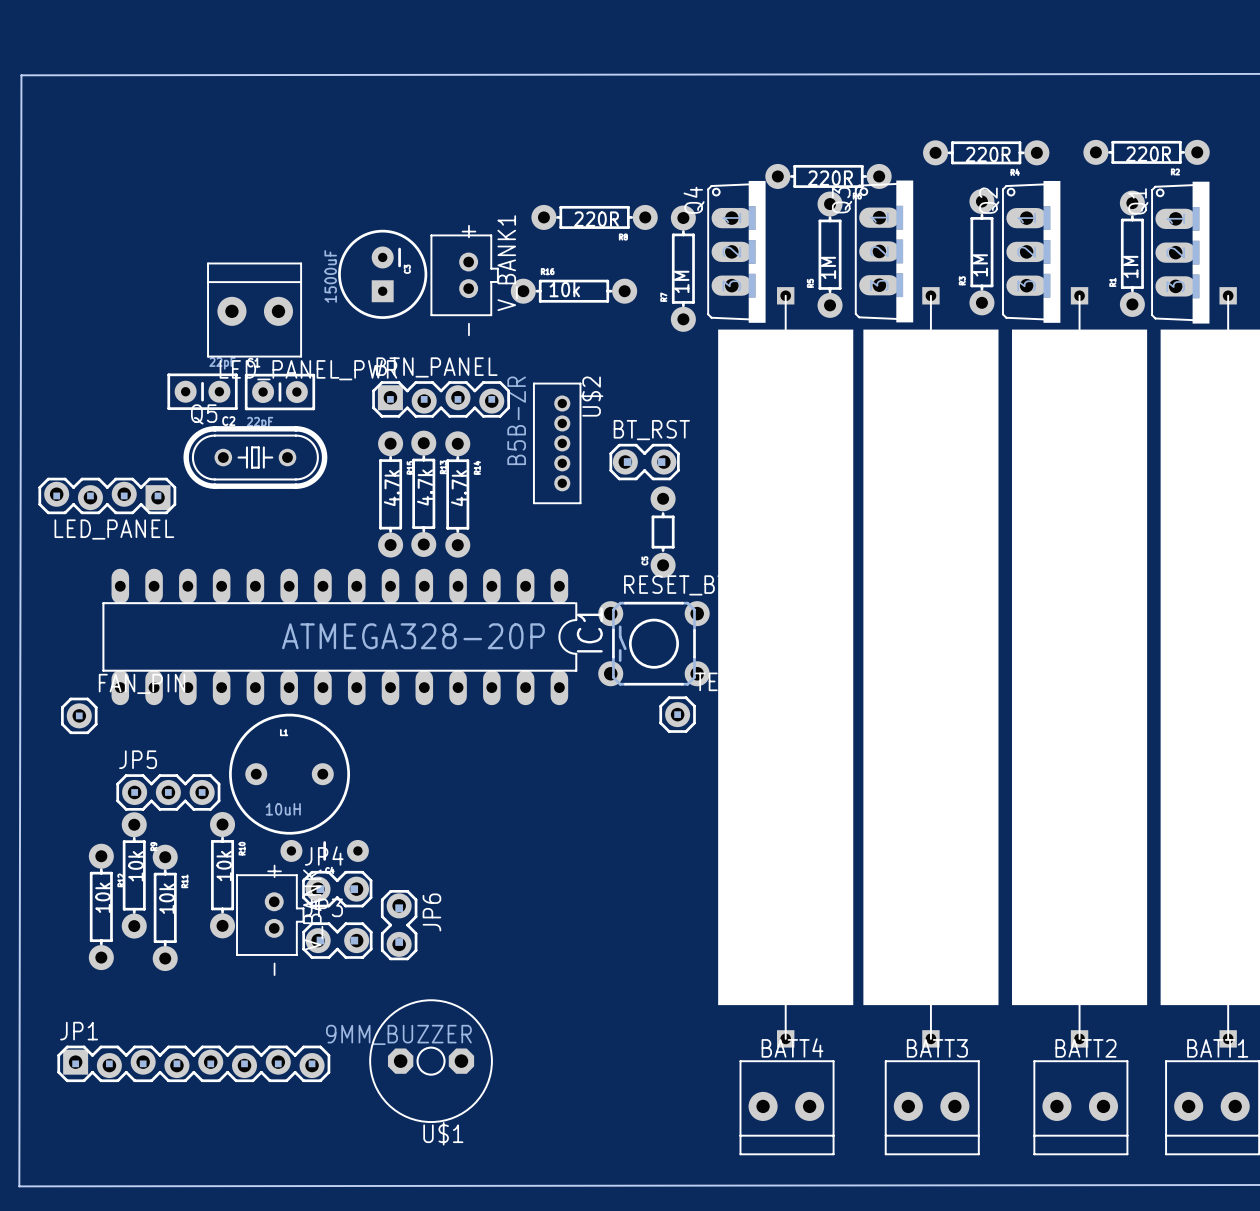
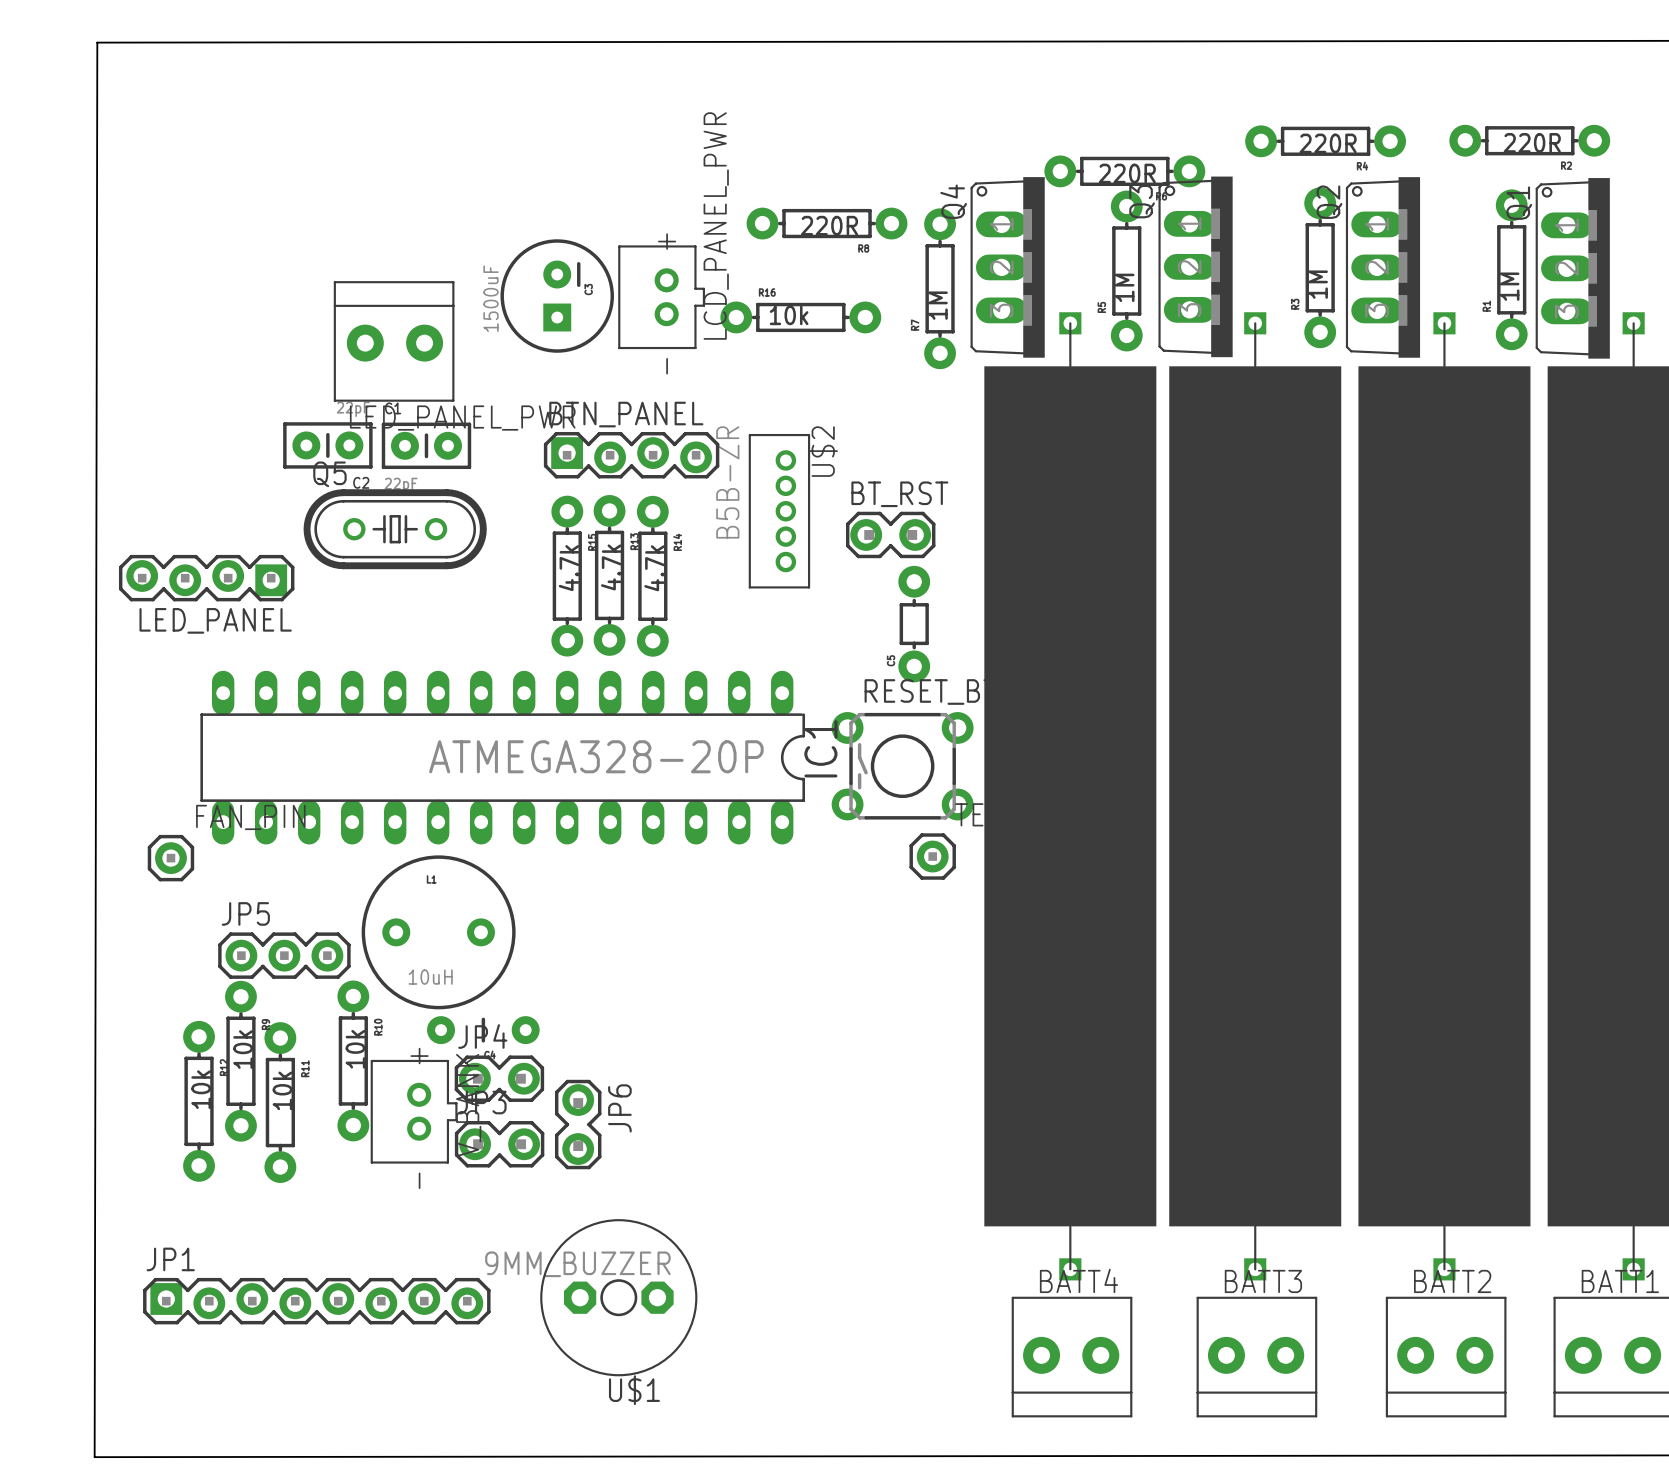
V_BANK1 name: V_BANK1 (507, 263) -> LCD_PANEL_PWR (716, 226)

